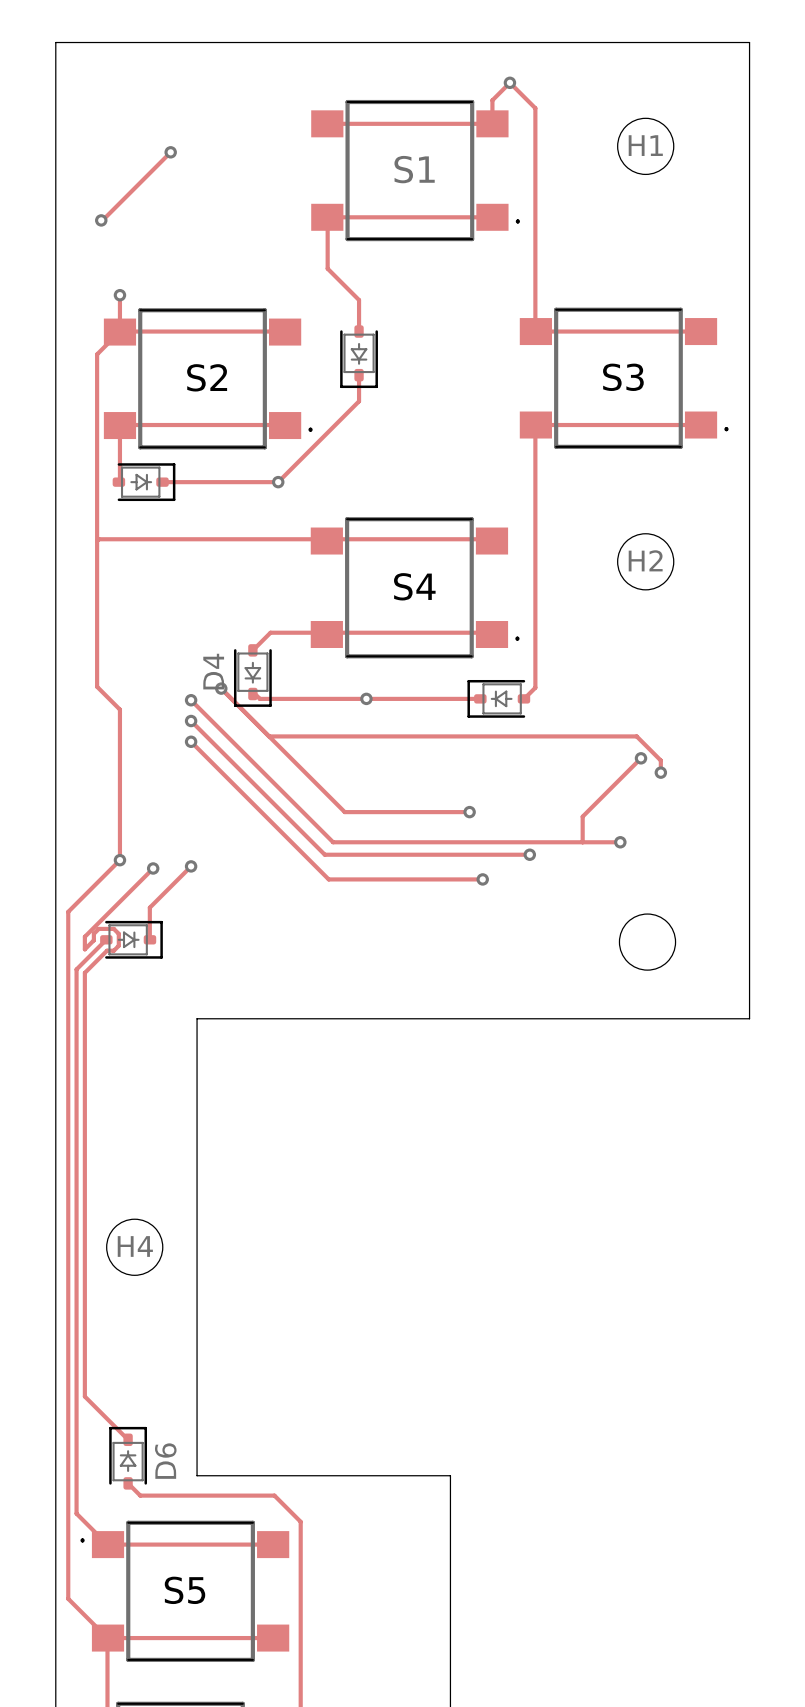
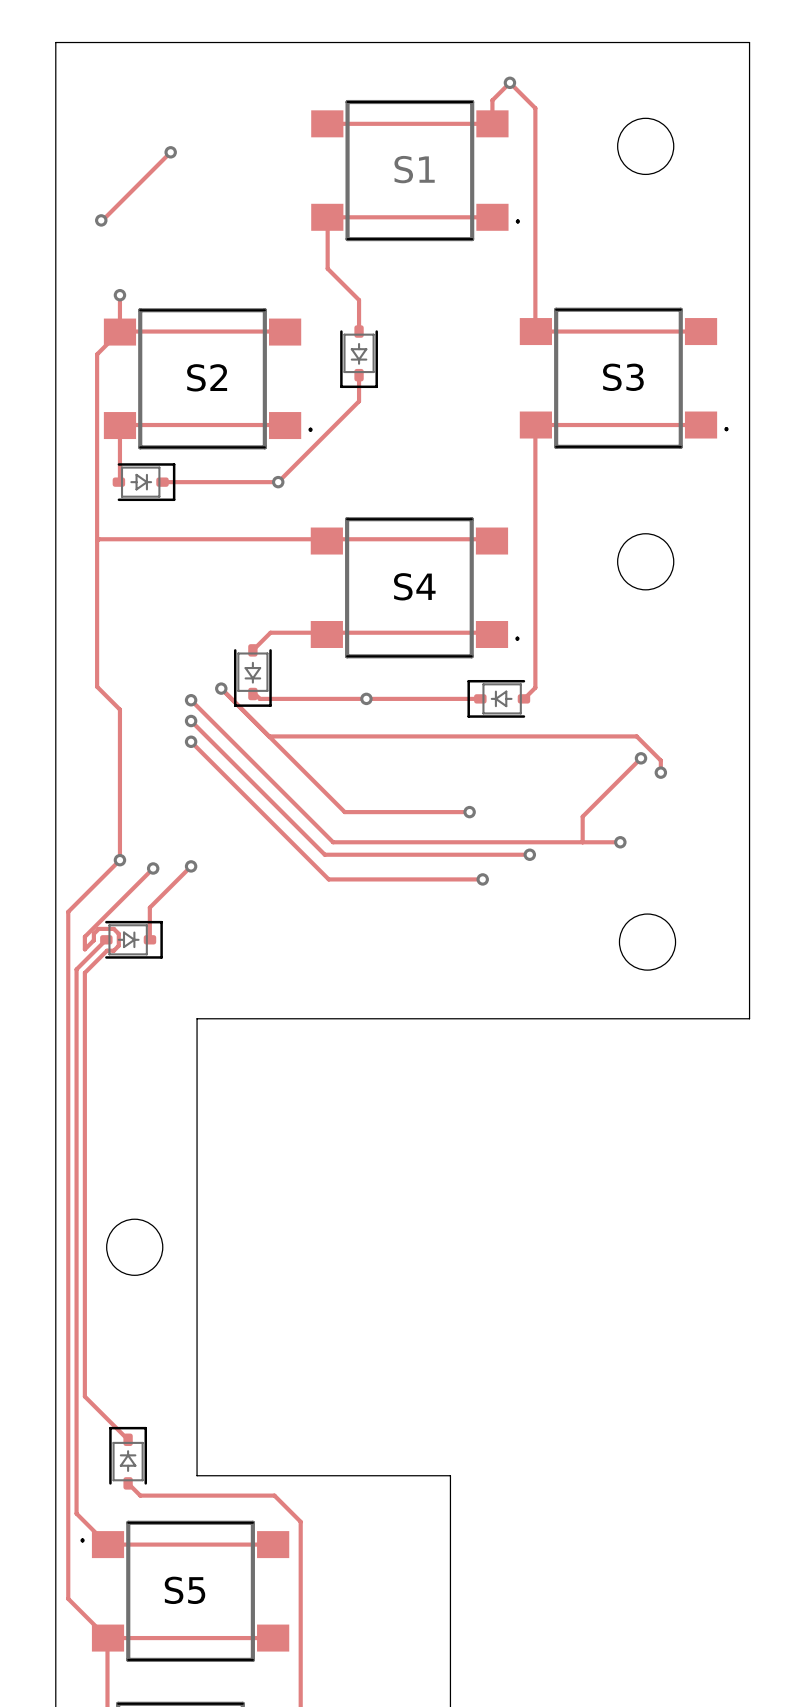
H1 name: H1 (645, 145) -> none
H2 name: H2 (645, 560) -> none
D4 name: D4 (213, 671) -> none
H4 name: H4 (135, 1246) -> none
D6 name: D6 (165, 1461) -> none

